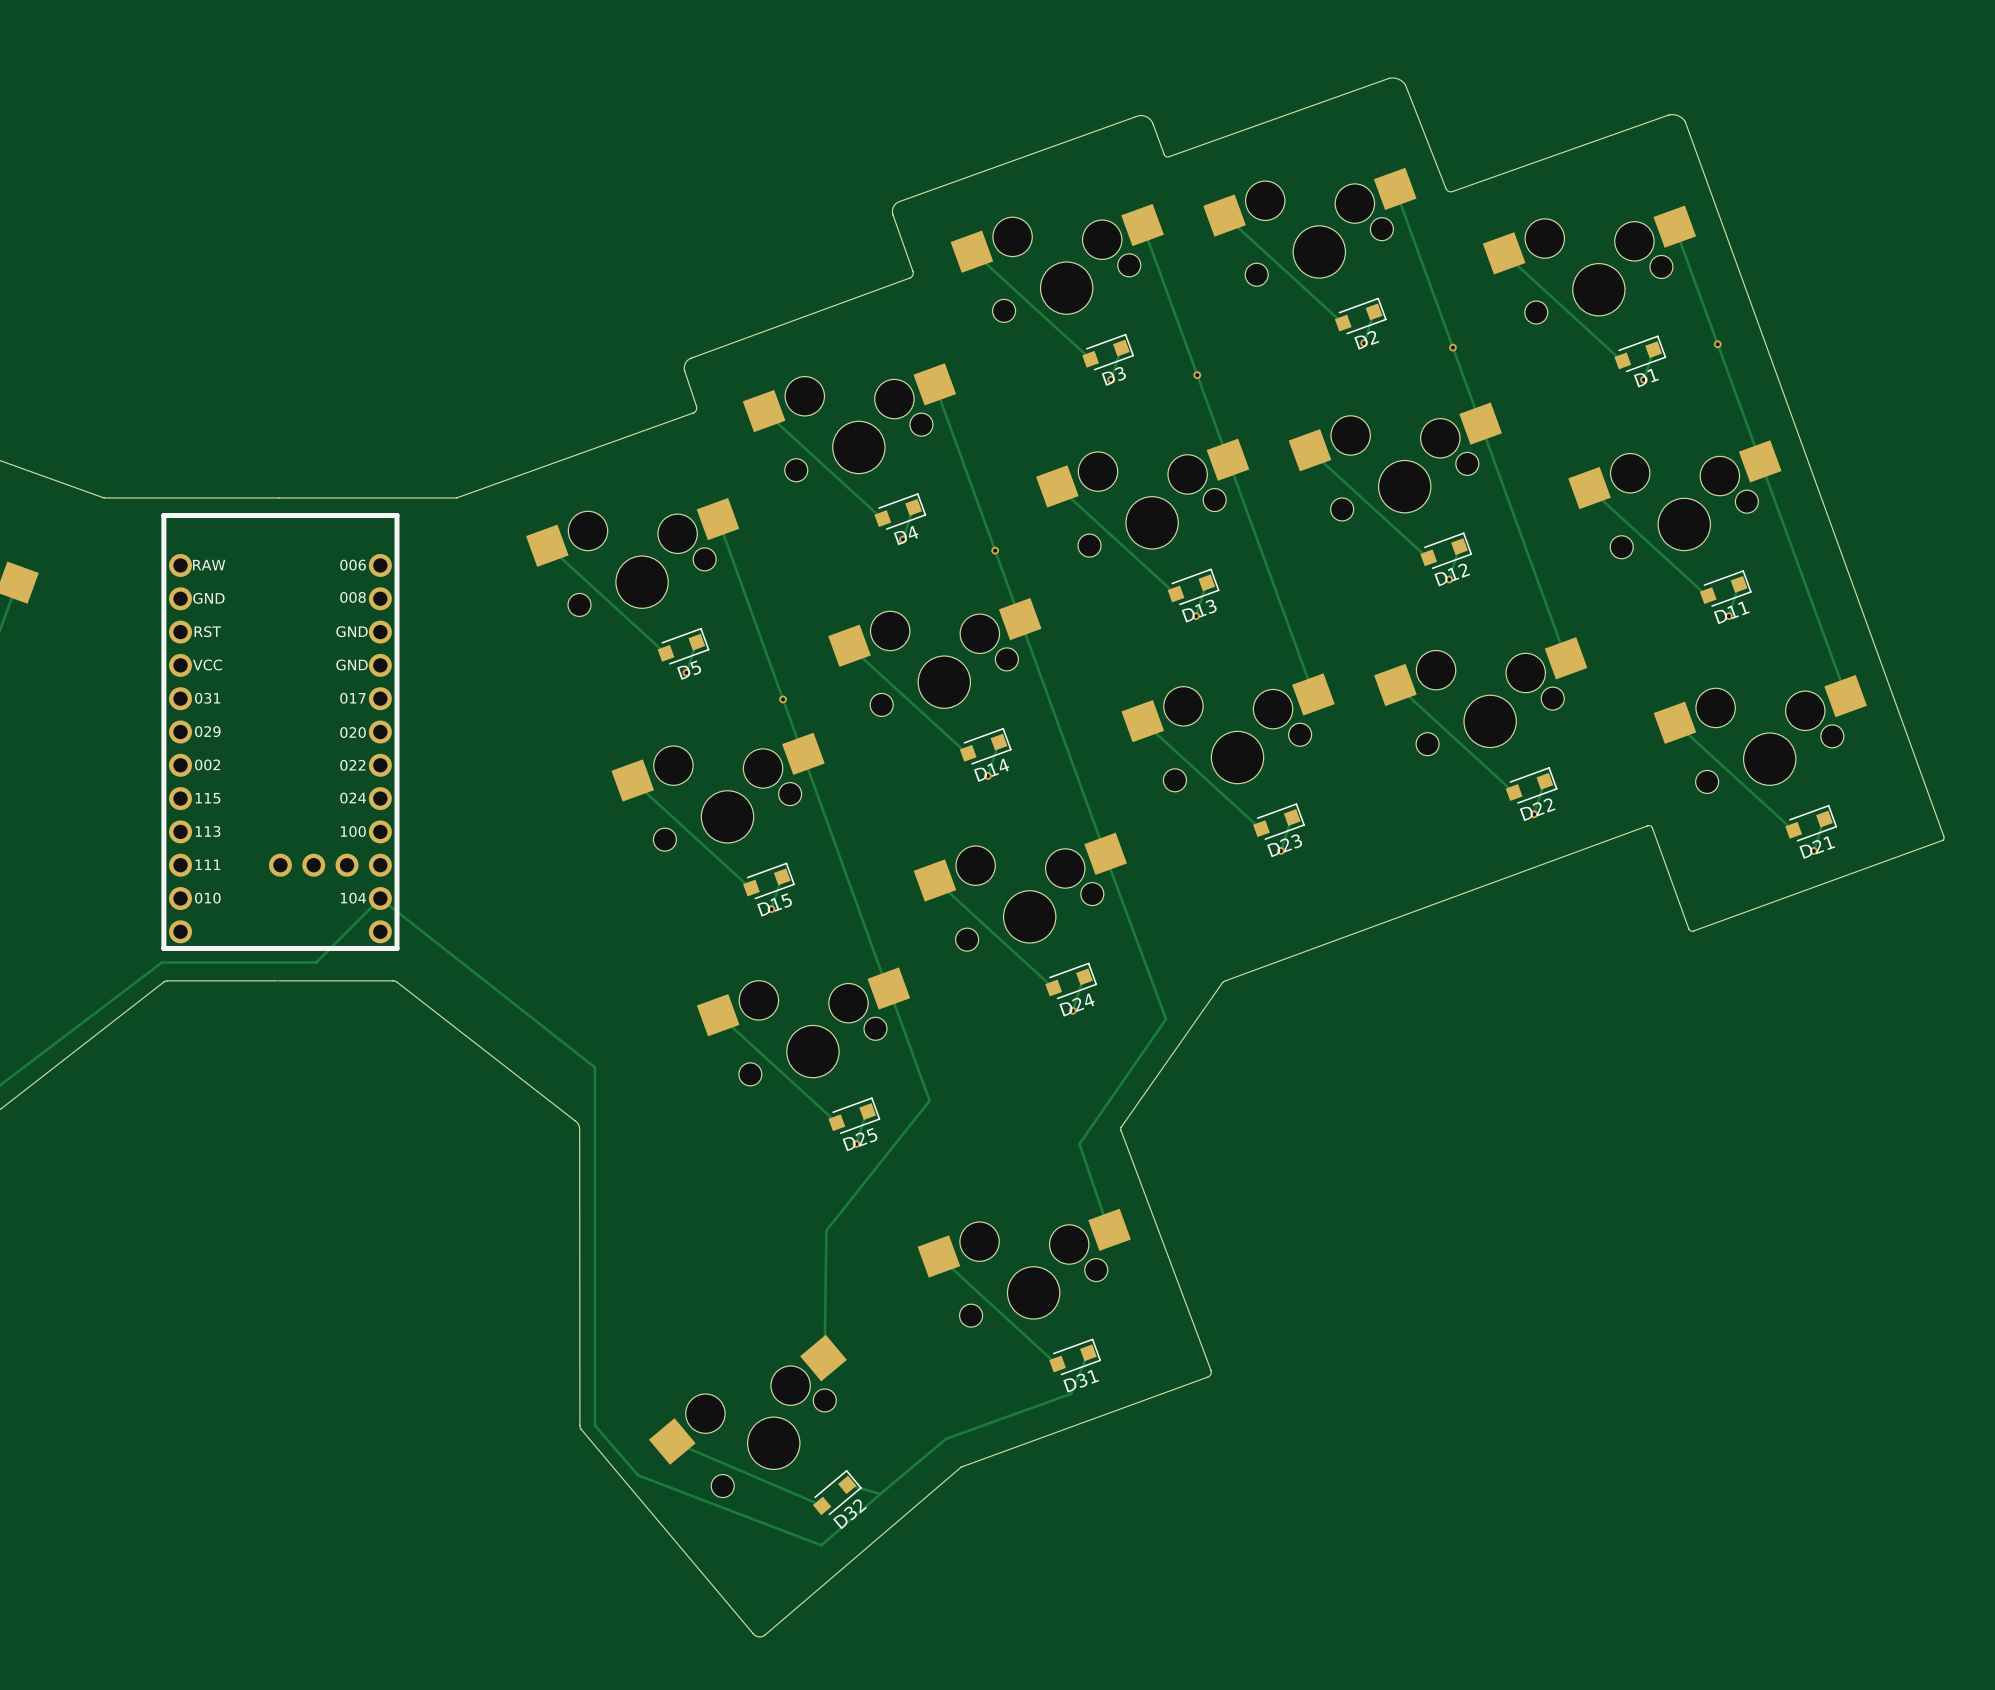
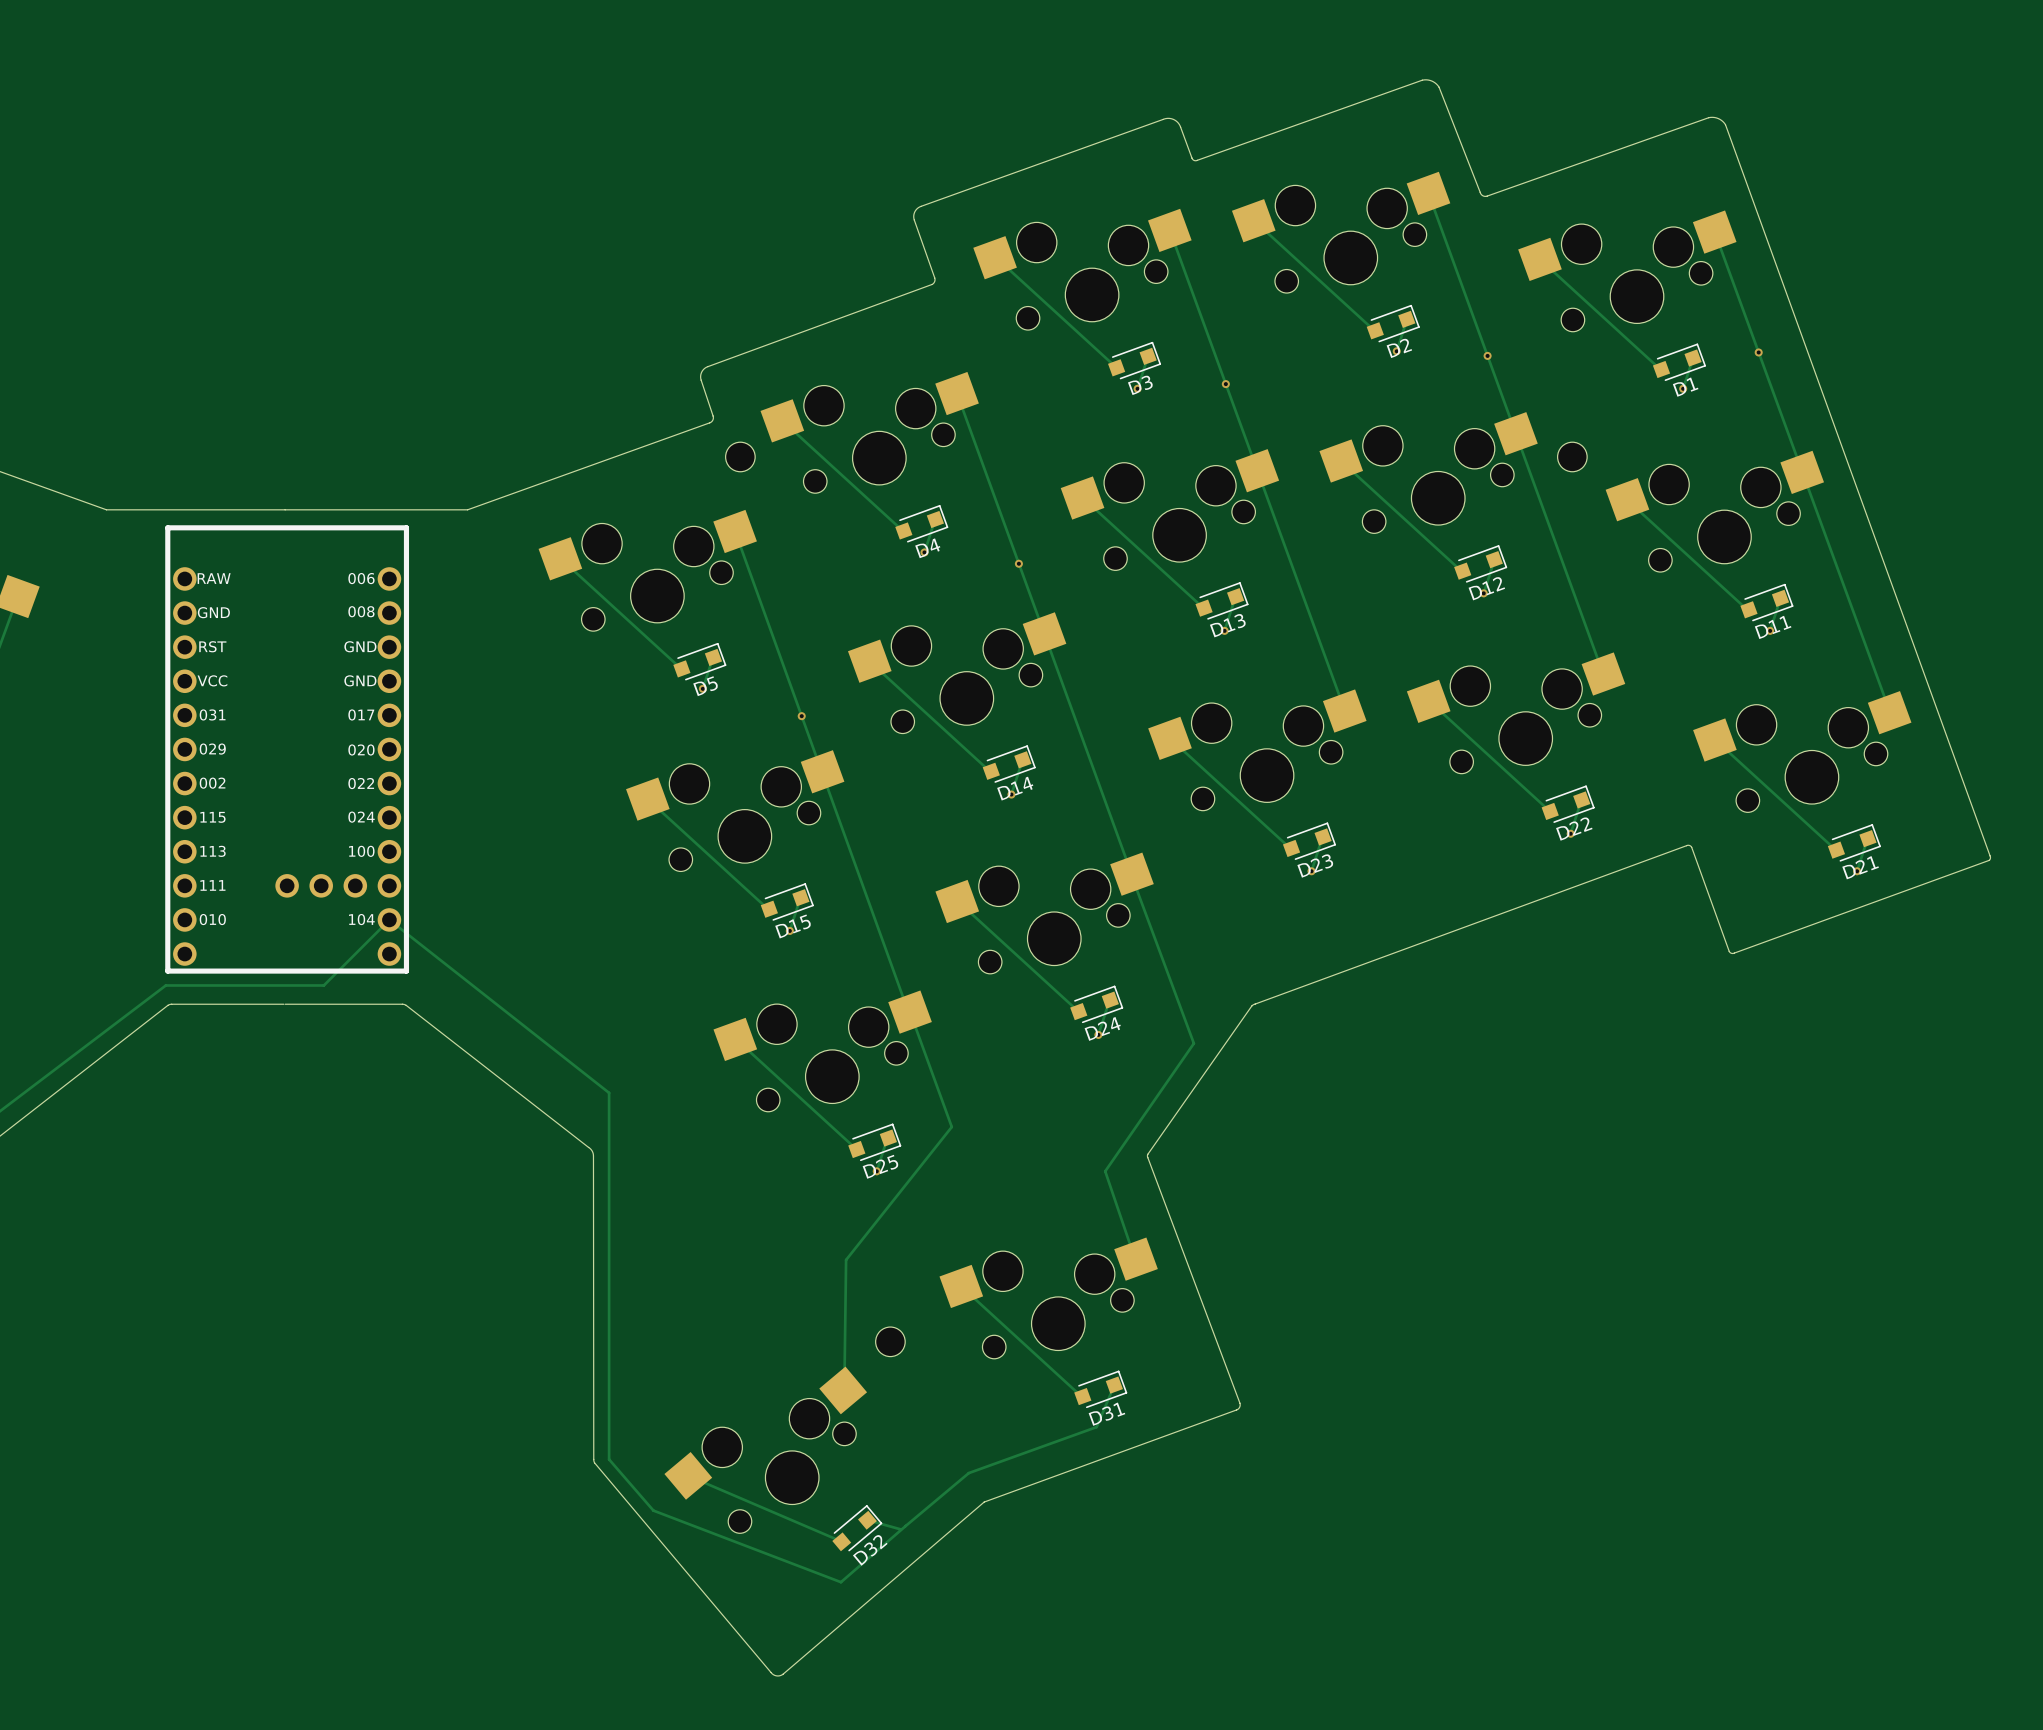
part: none -> (740, 456)
part: none -> (1572, 456)
part: none -> (890, 1341)

